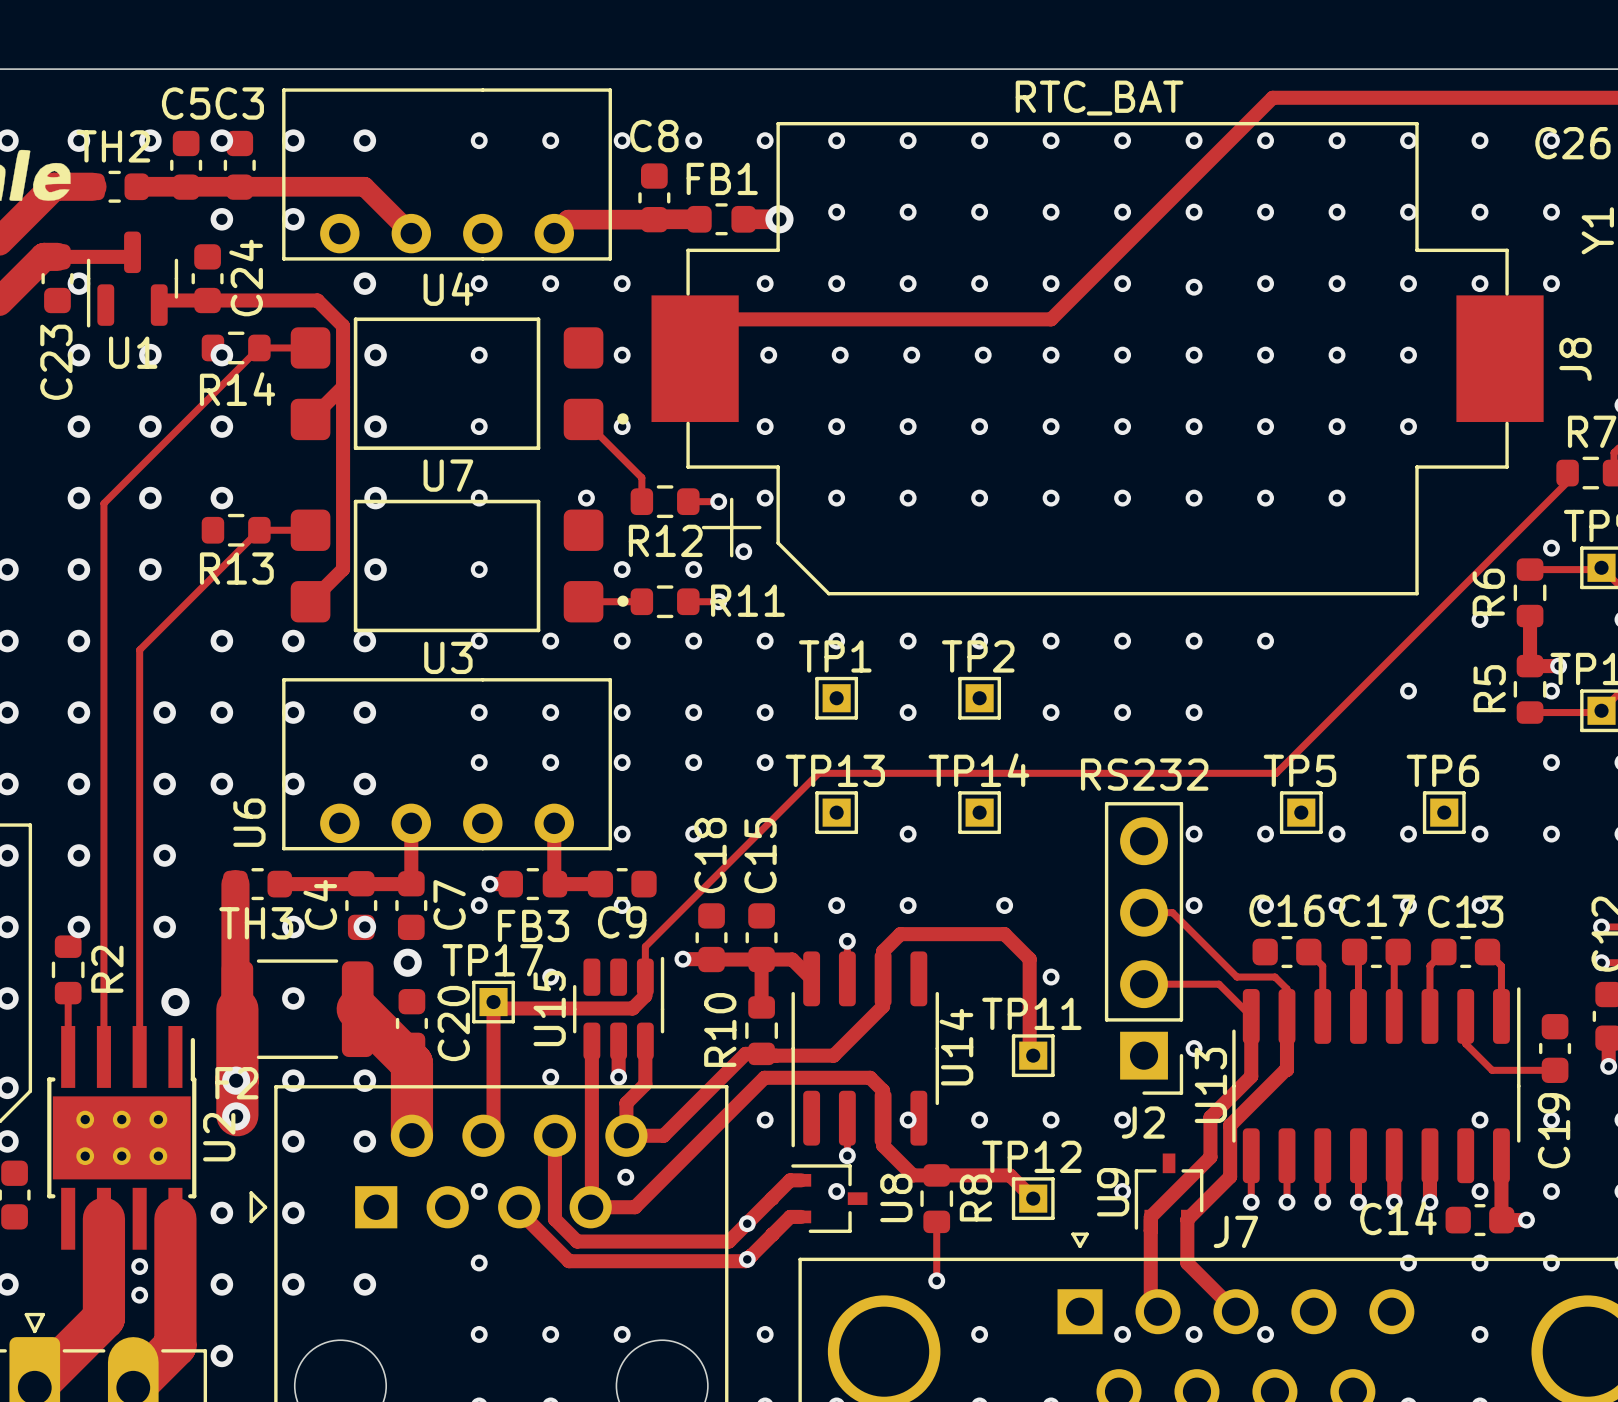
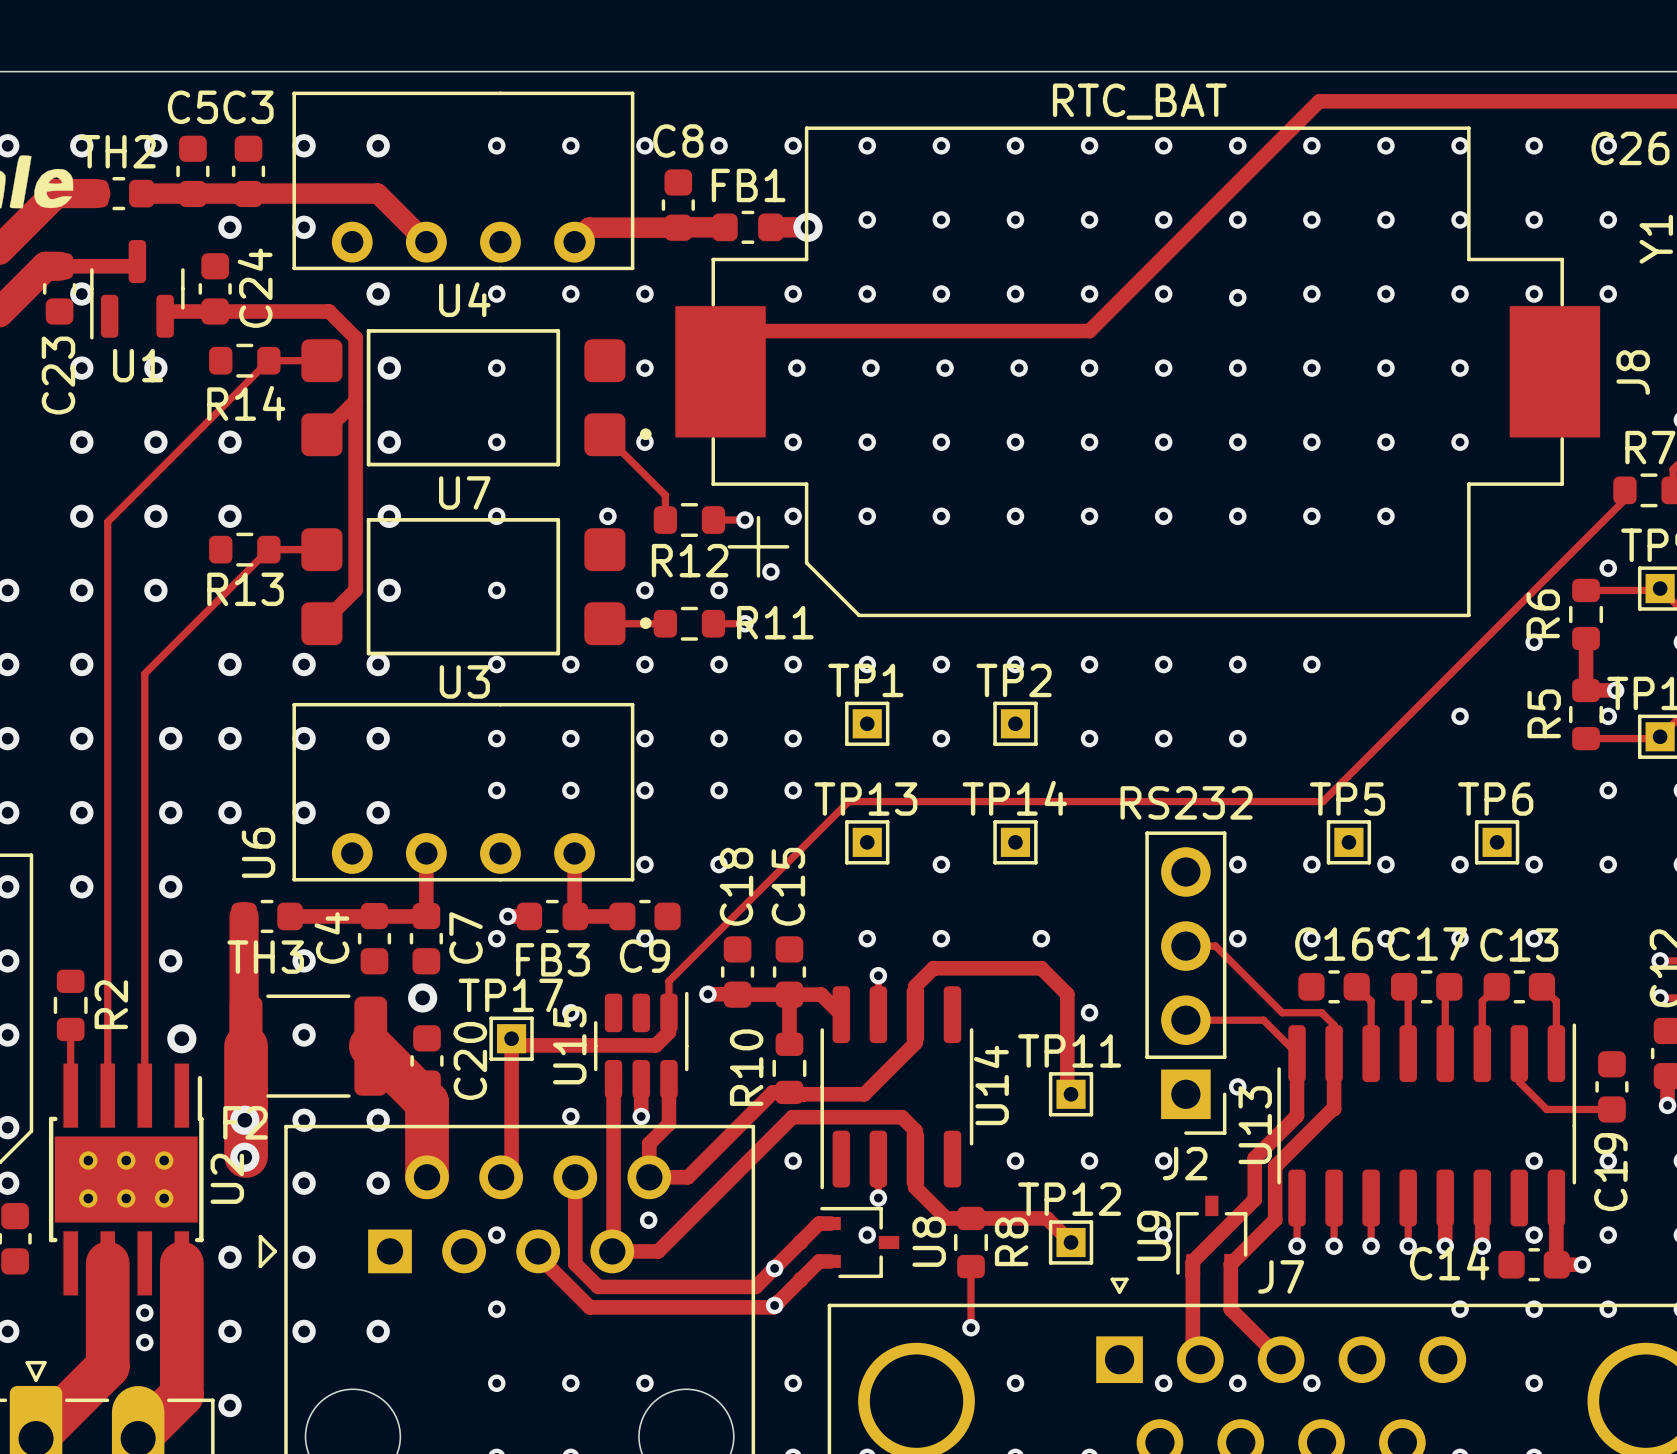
via: (221, 140) -> none
via: (221, 355) -> none
via: (78, 926) -> none
via: (364, 926) -> none
via: (908, 1120) -> none

